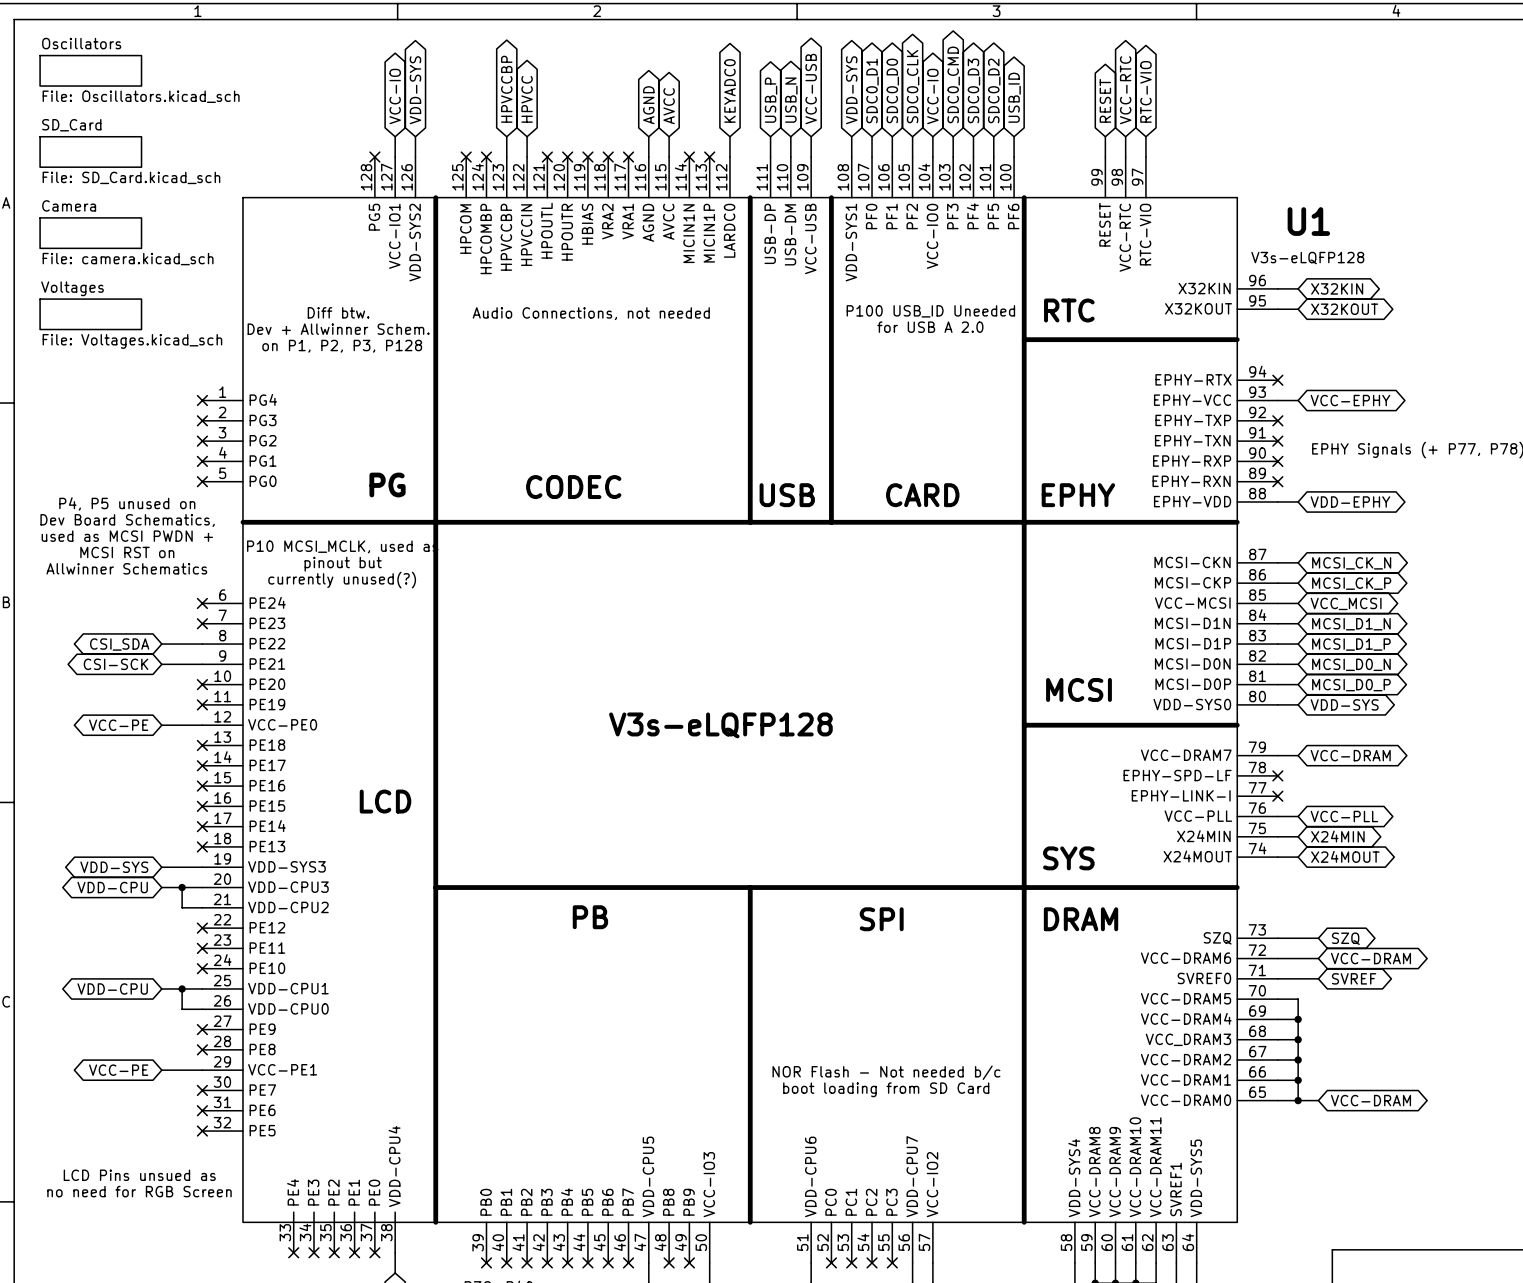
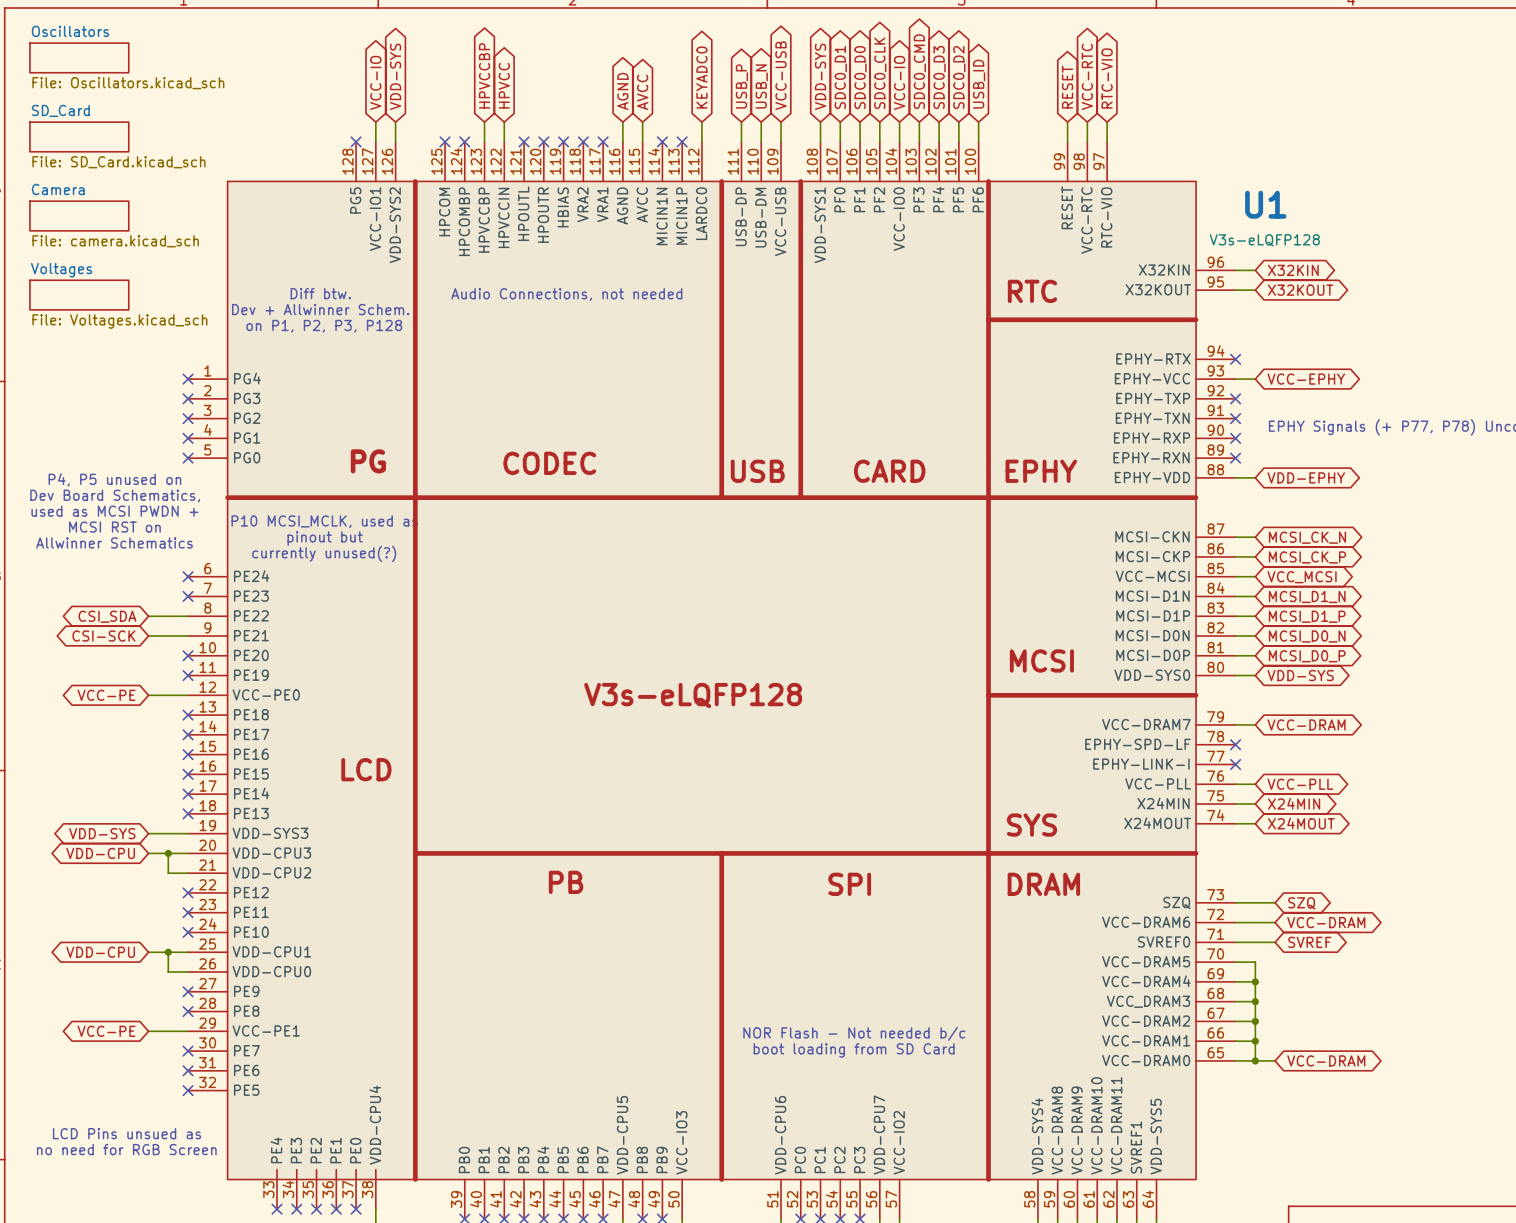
text: P100 USB_ID Uneeded (930, 311) -> none
text: for USB A 2.0 (930, 327) -> none

